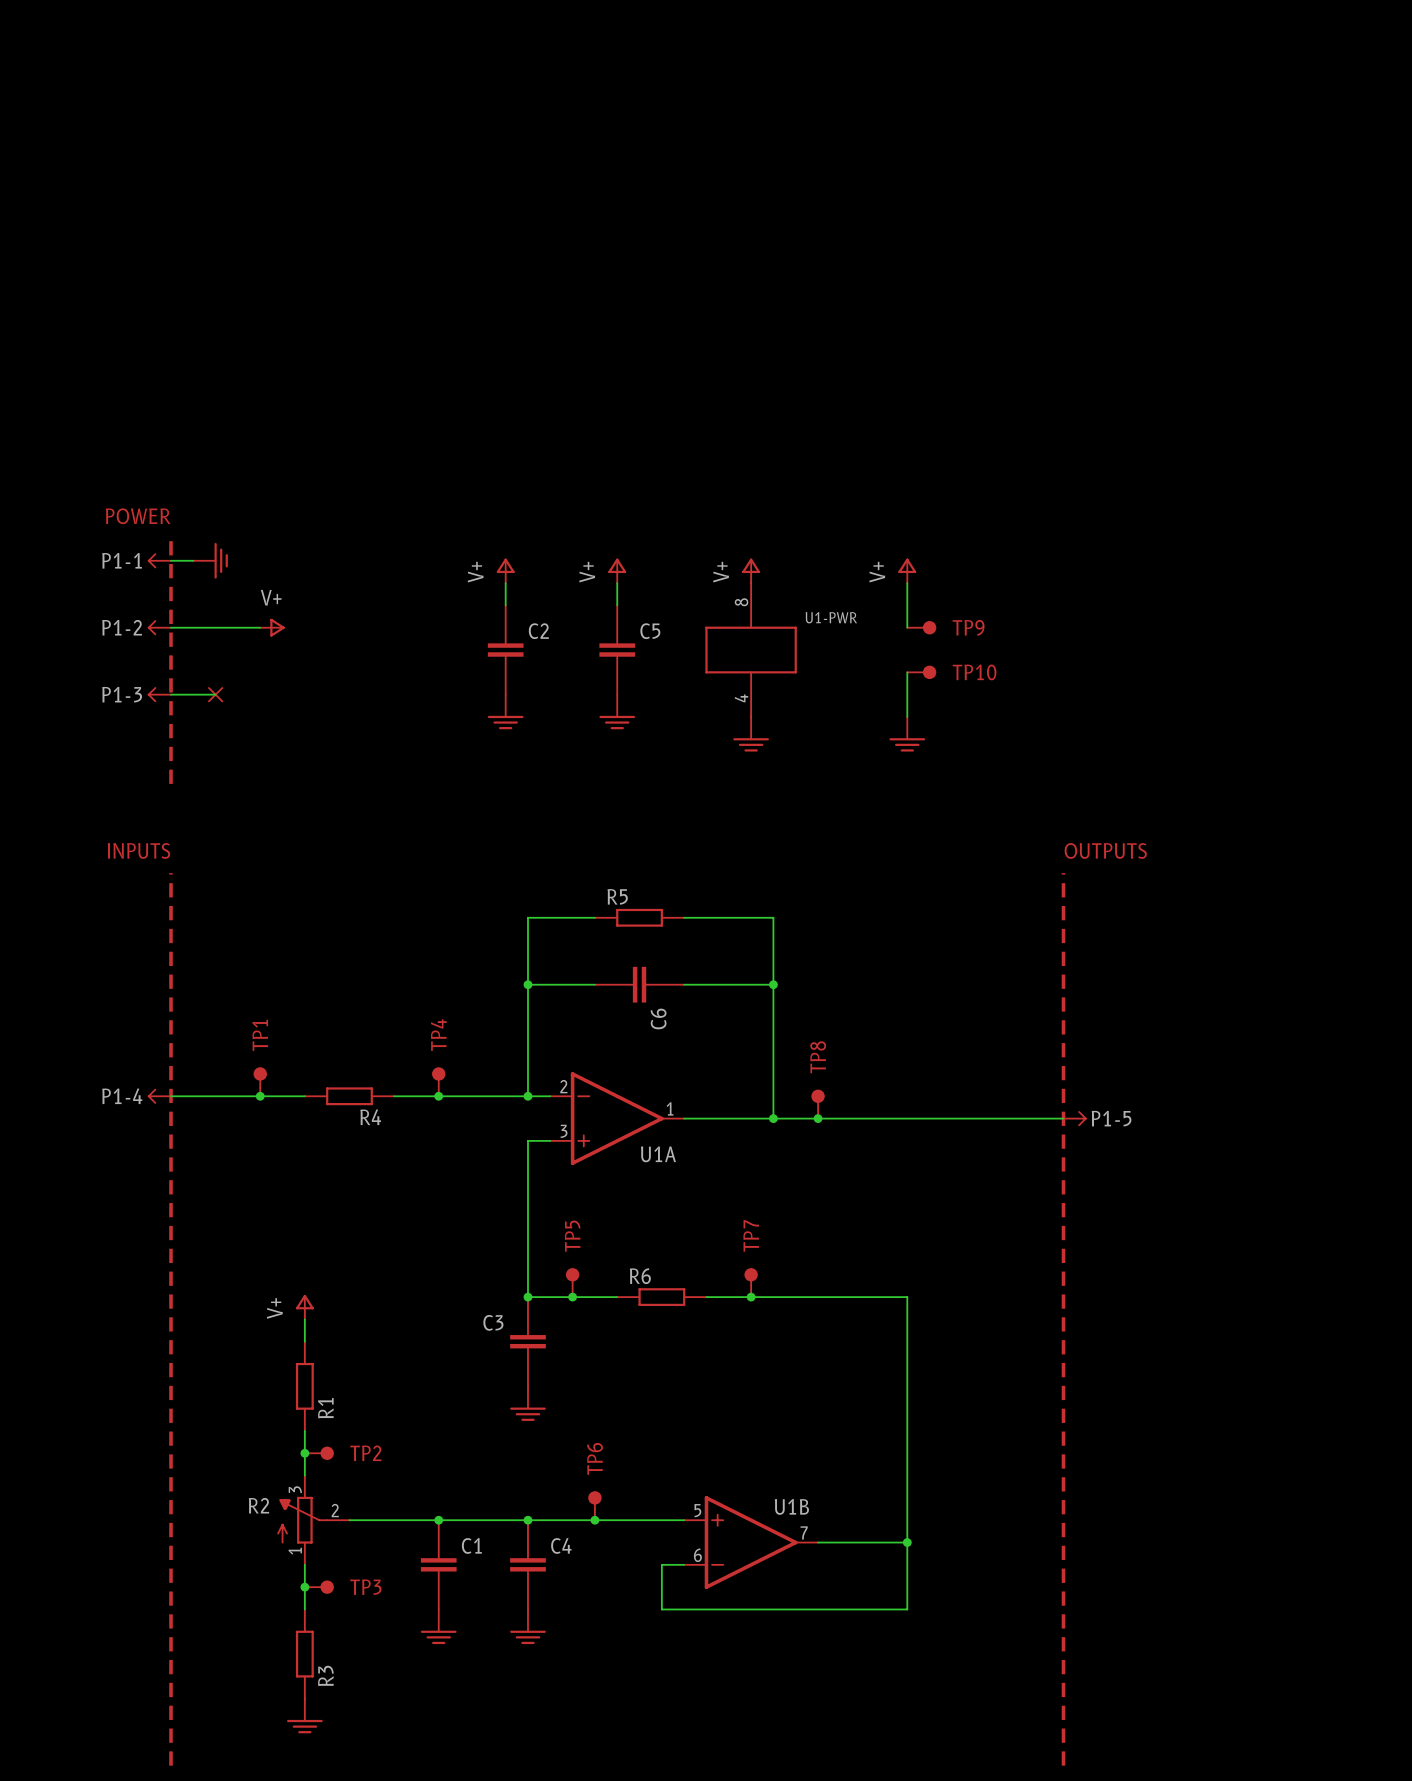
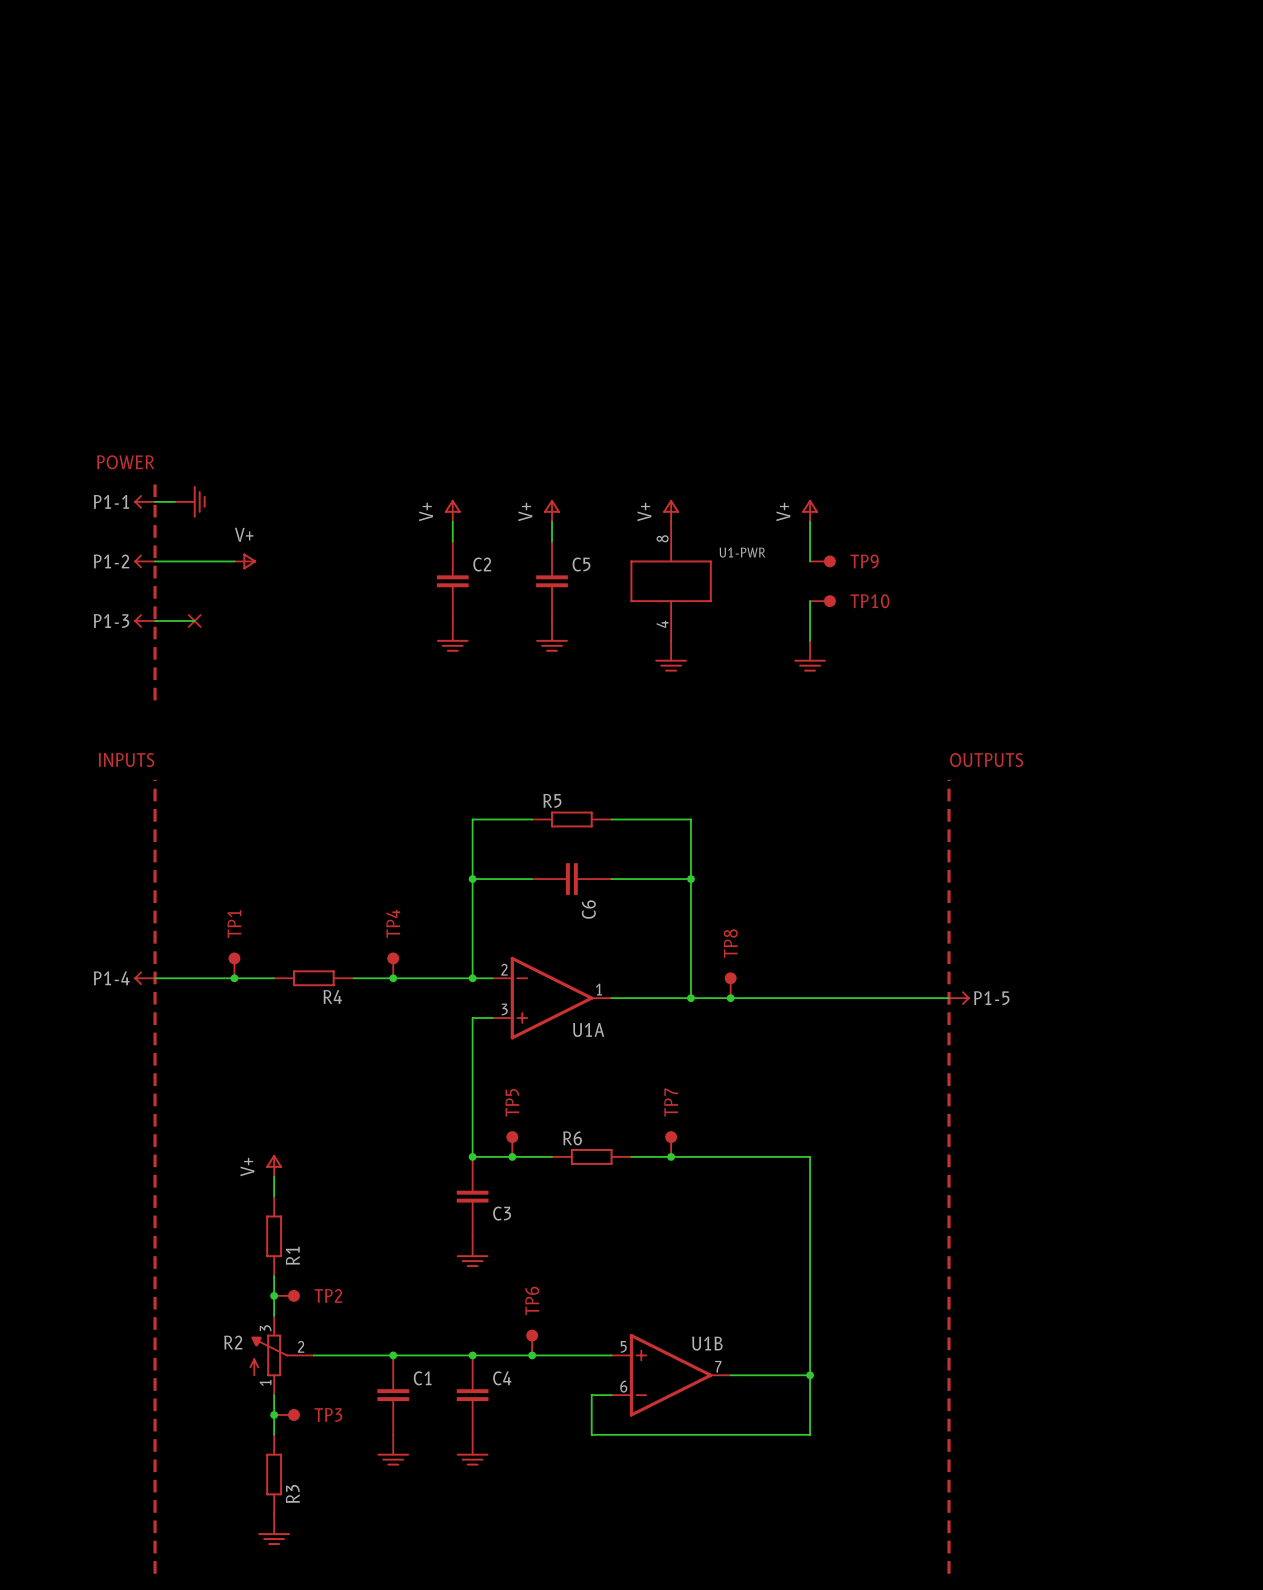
C3 name position: C3 (493, 1322) -> C3 (502, 1213)

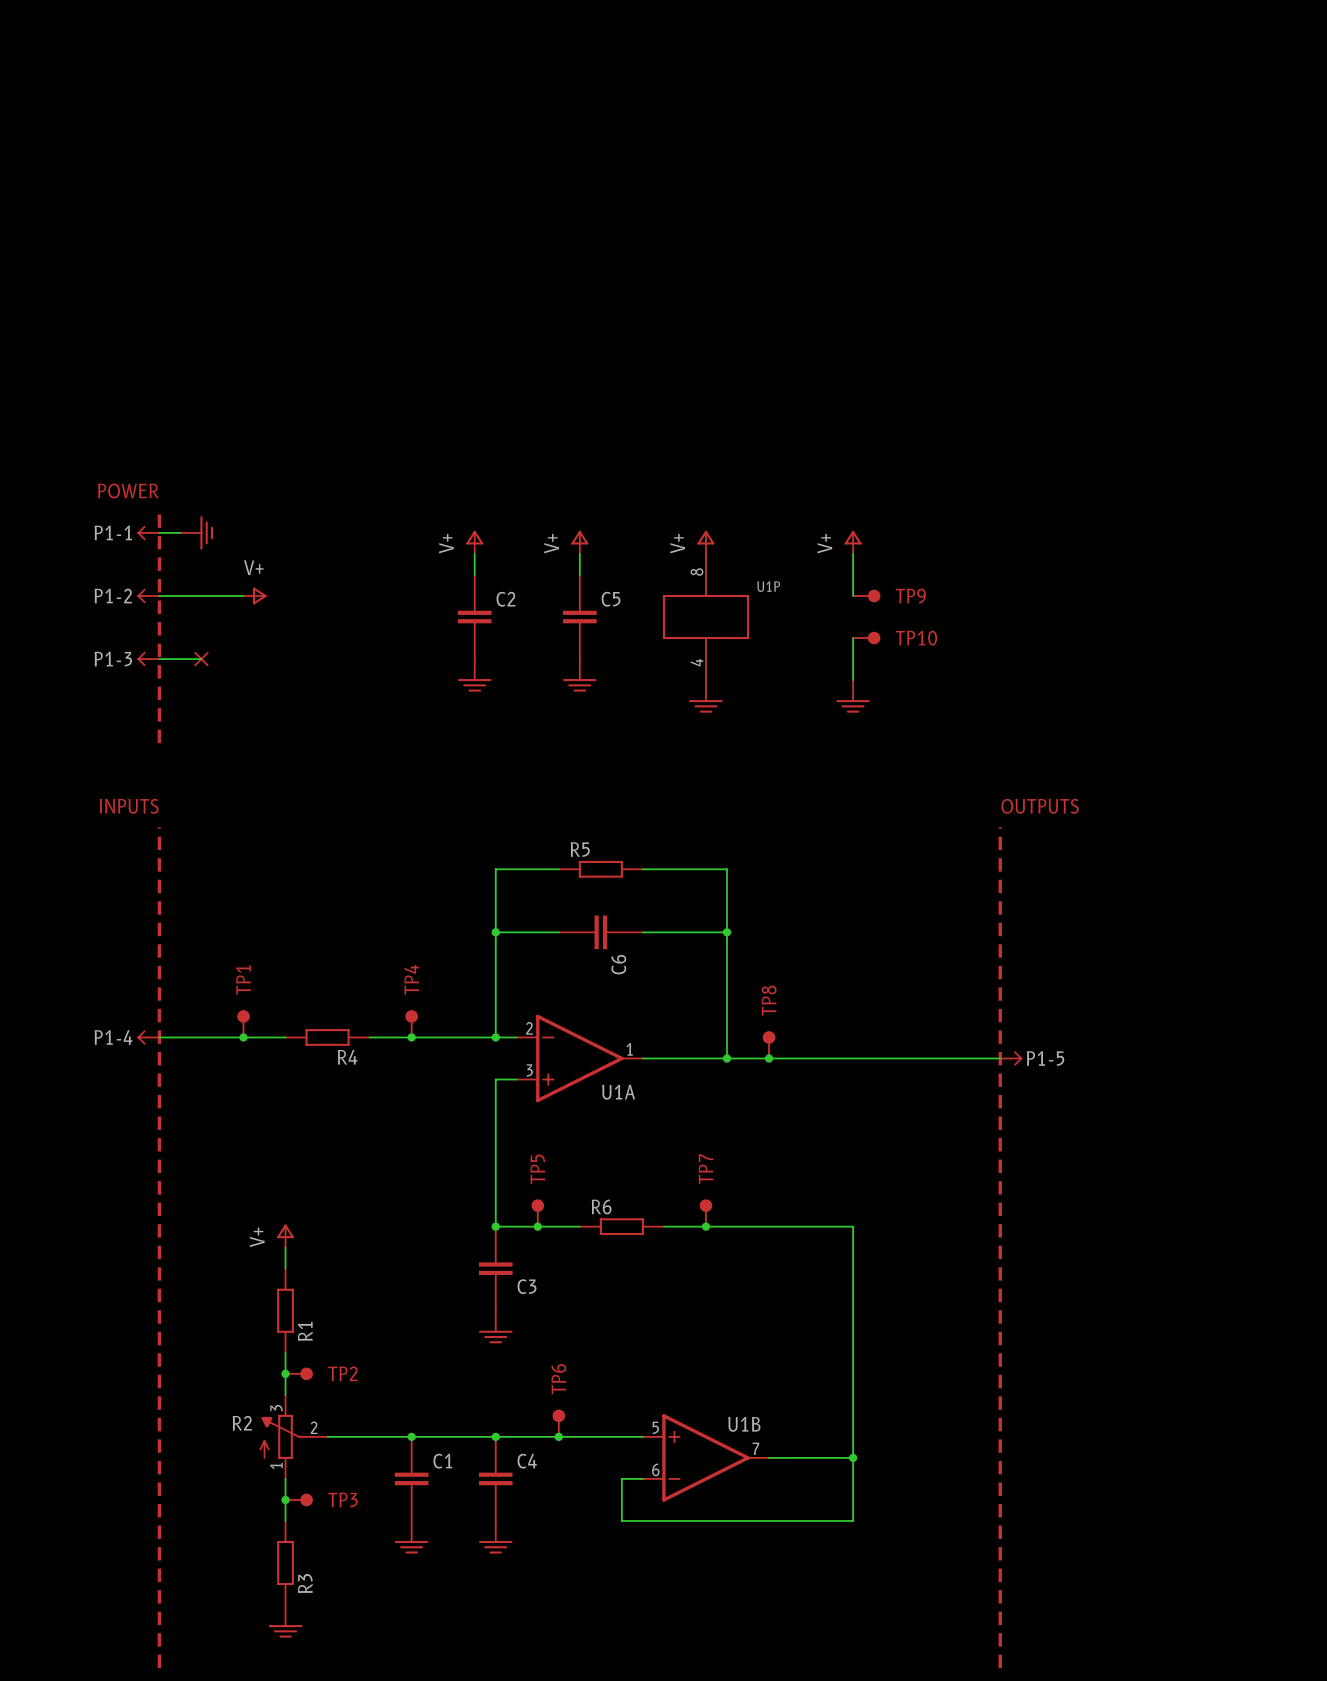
U1-PWR name: U1-PWR (742, 552) -> U1P (768, 586)

